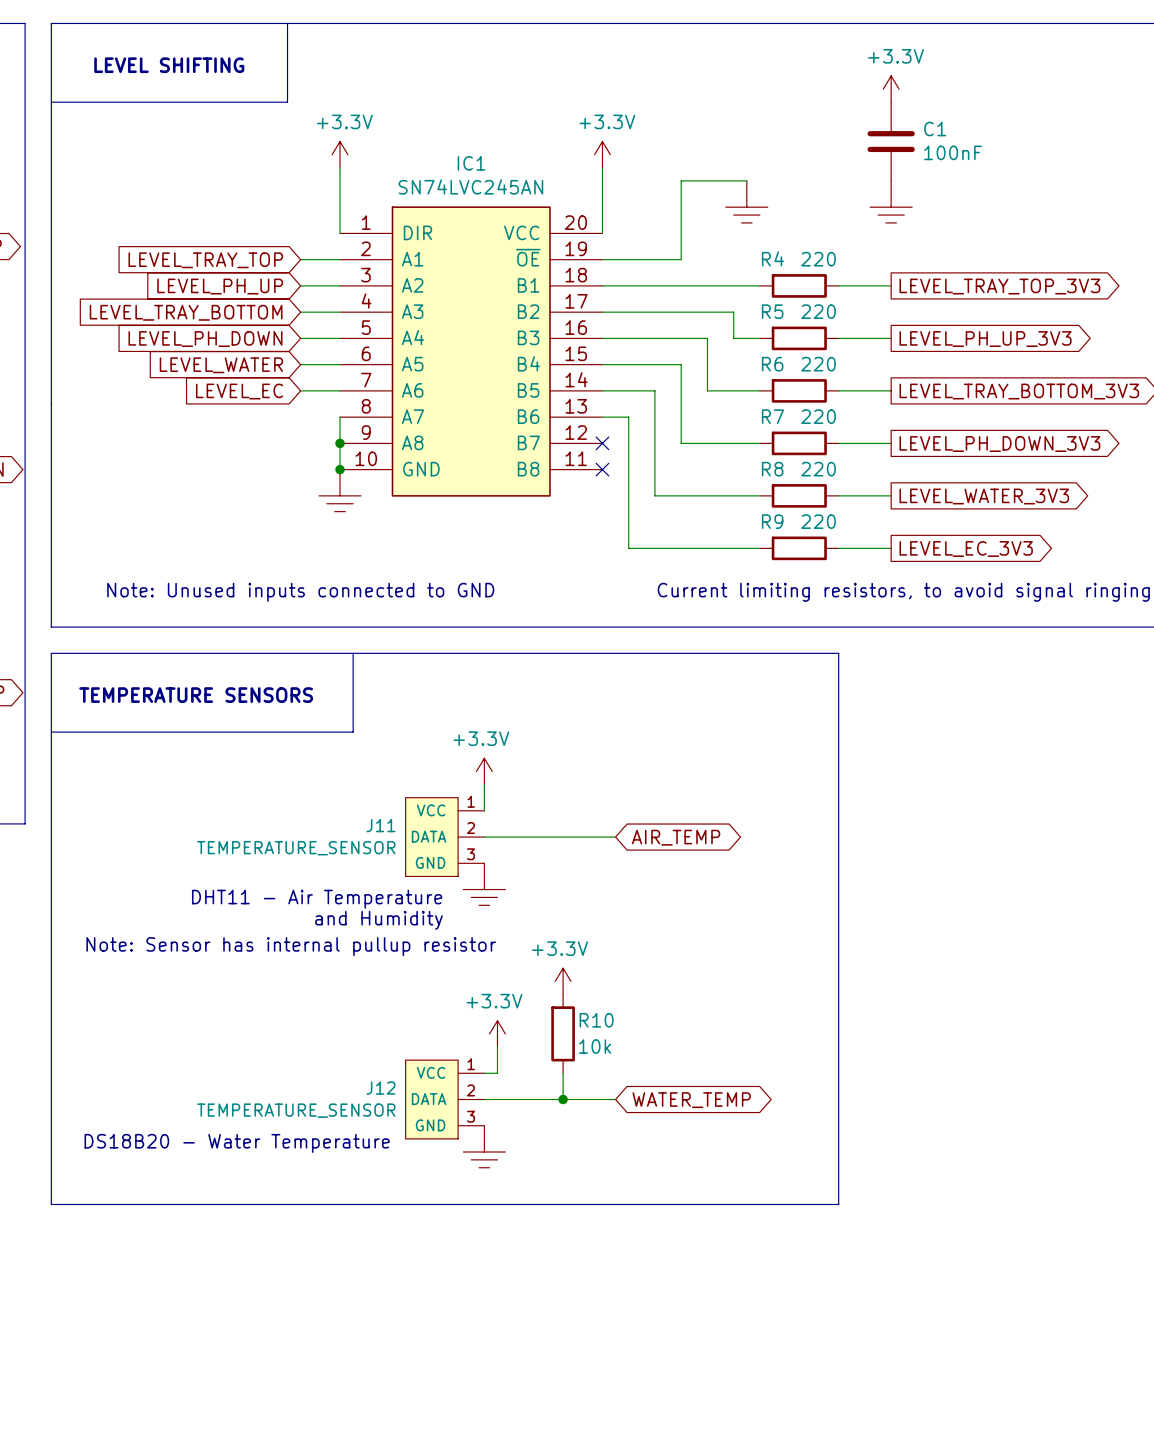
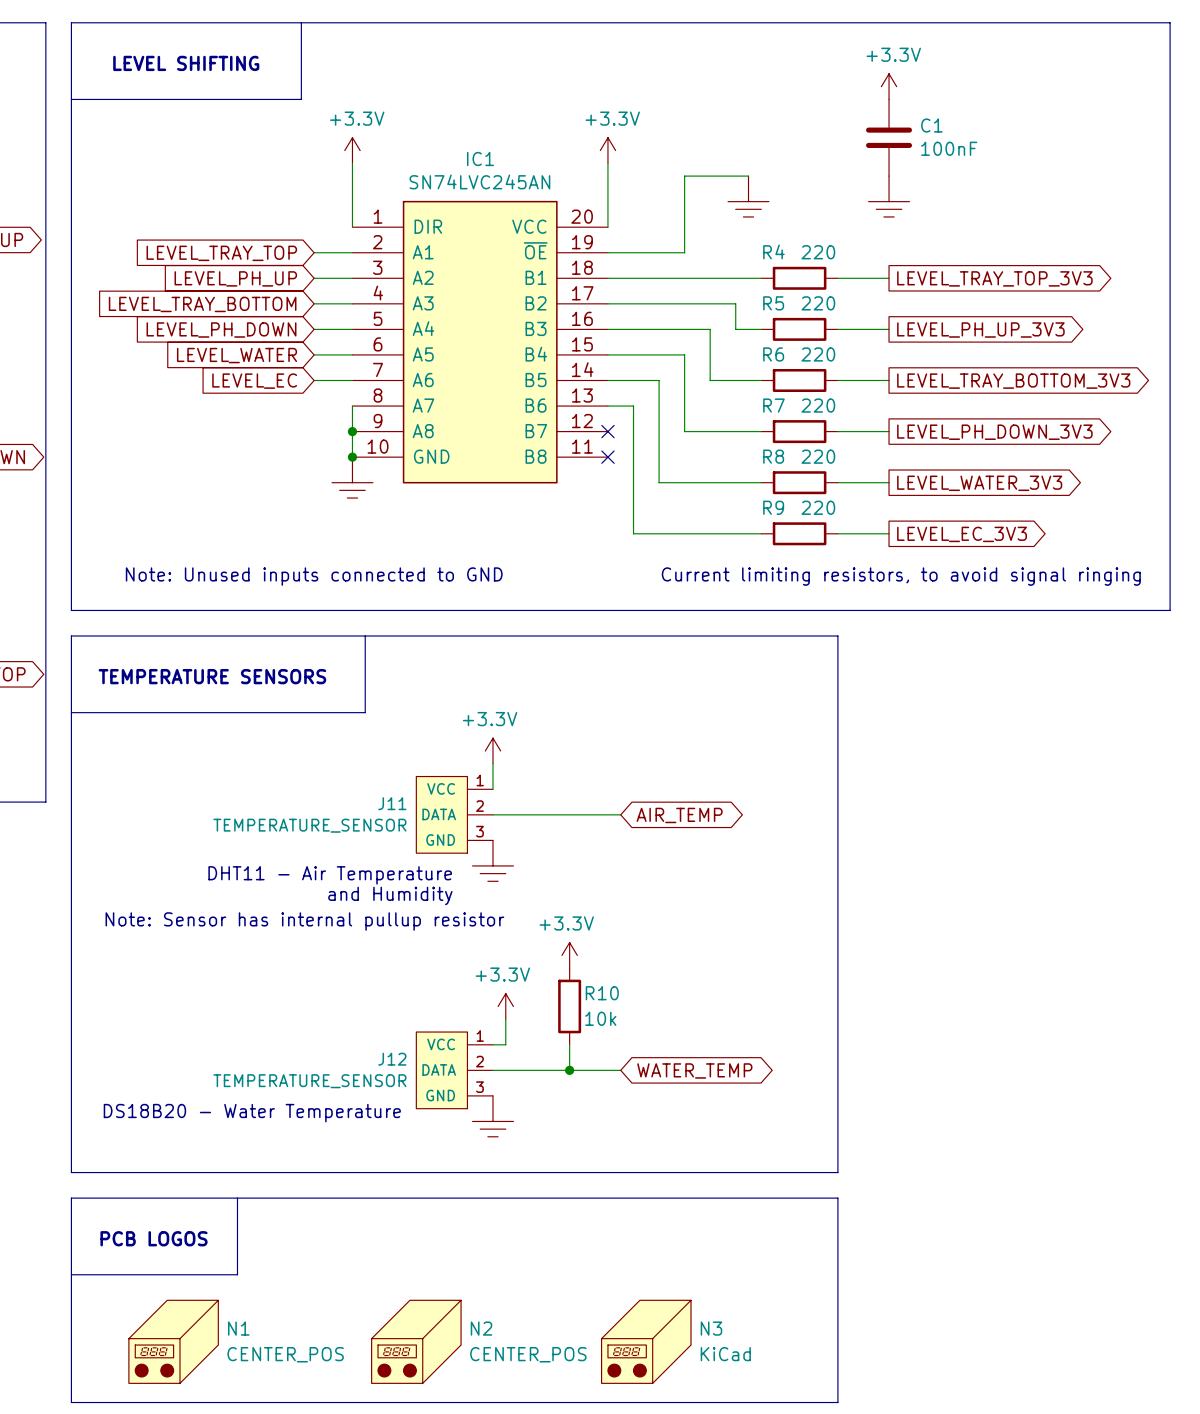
line: none -> (71, 1198) (71, 1402) (837, 1402) (837, 1198) (71, 1198)
line: none -> (237, 1198) (237, 1274) (71, 1274)
text: none -> PCB LOGOS (154, 1238)
N1: none -> CENTER_POS (173, 1341)
N2: none -> CENTER_POS (416, 1341)
N3: none -> KiCad (646, 1341)

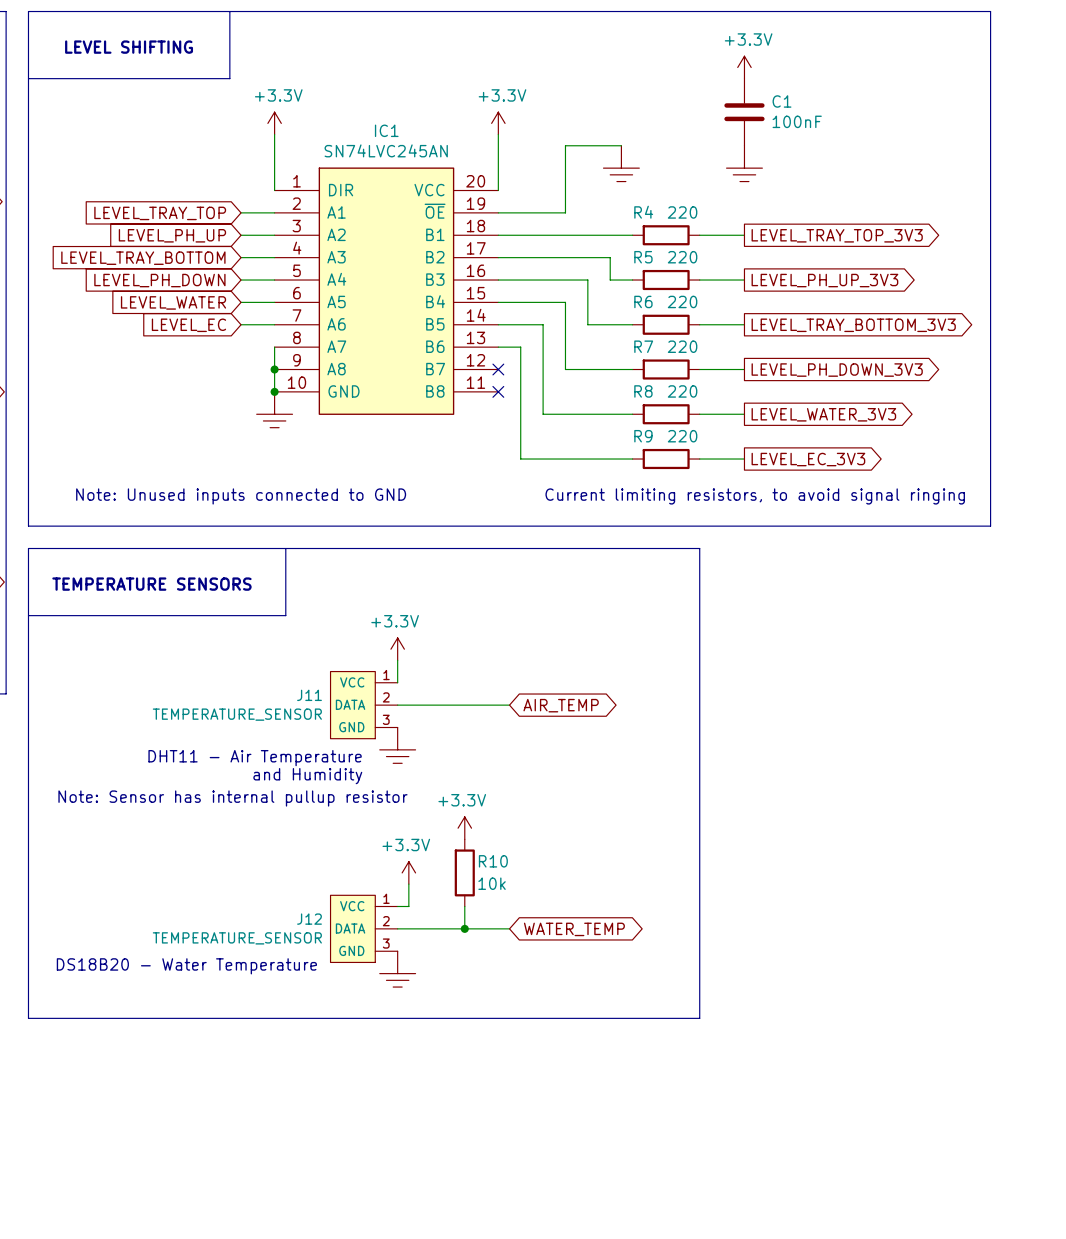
line: (71, 1198) (71, 1402) (837, 1402) (837, 1198) (71, 1198) -> none
line: (237, 1198) (237, 1274) (71, 1274) -> none
text: PCB LOGOS (154, 1238) -> none
N1: CENTER_POS (173, 1341) -> none
N2: CENTER_POS (416, 1341) -> none
N3: KiCad (646, 1341) -> none

